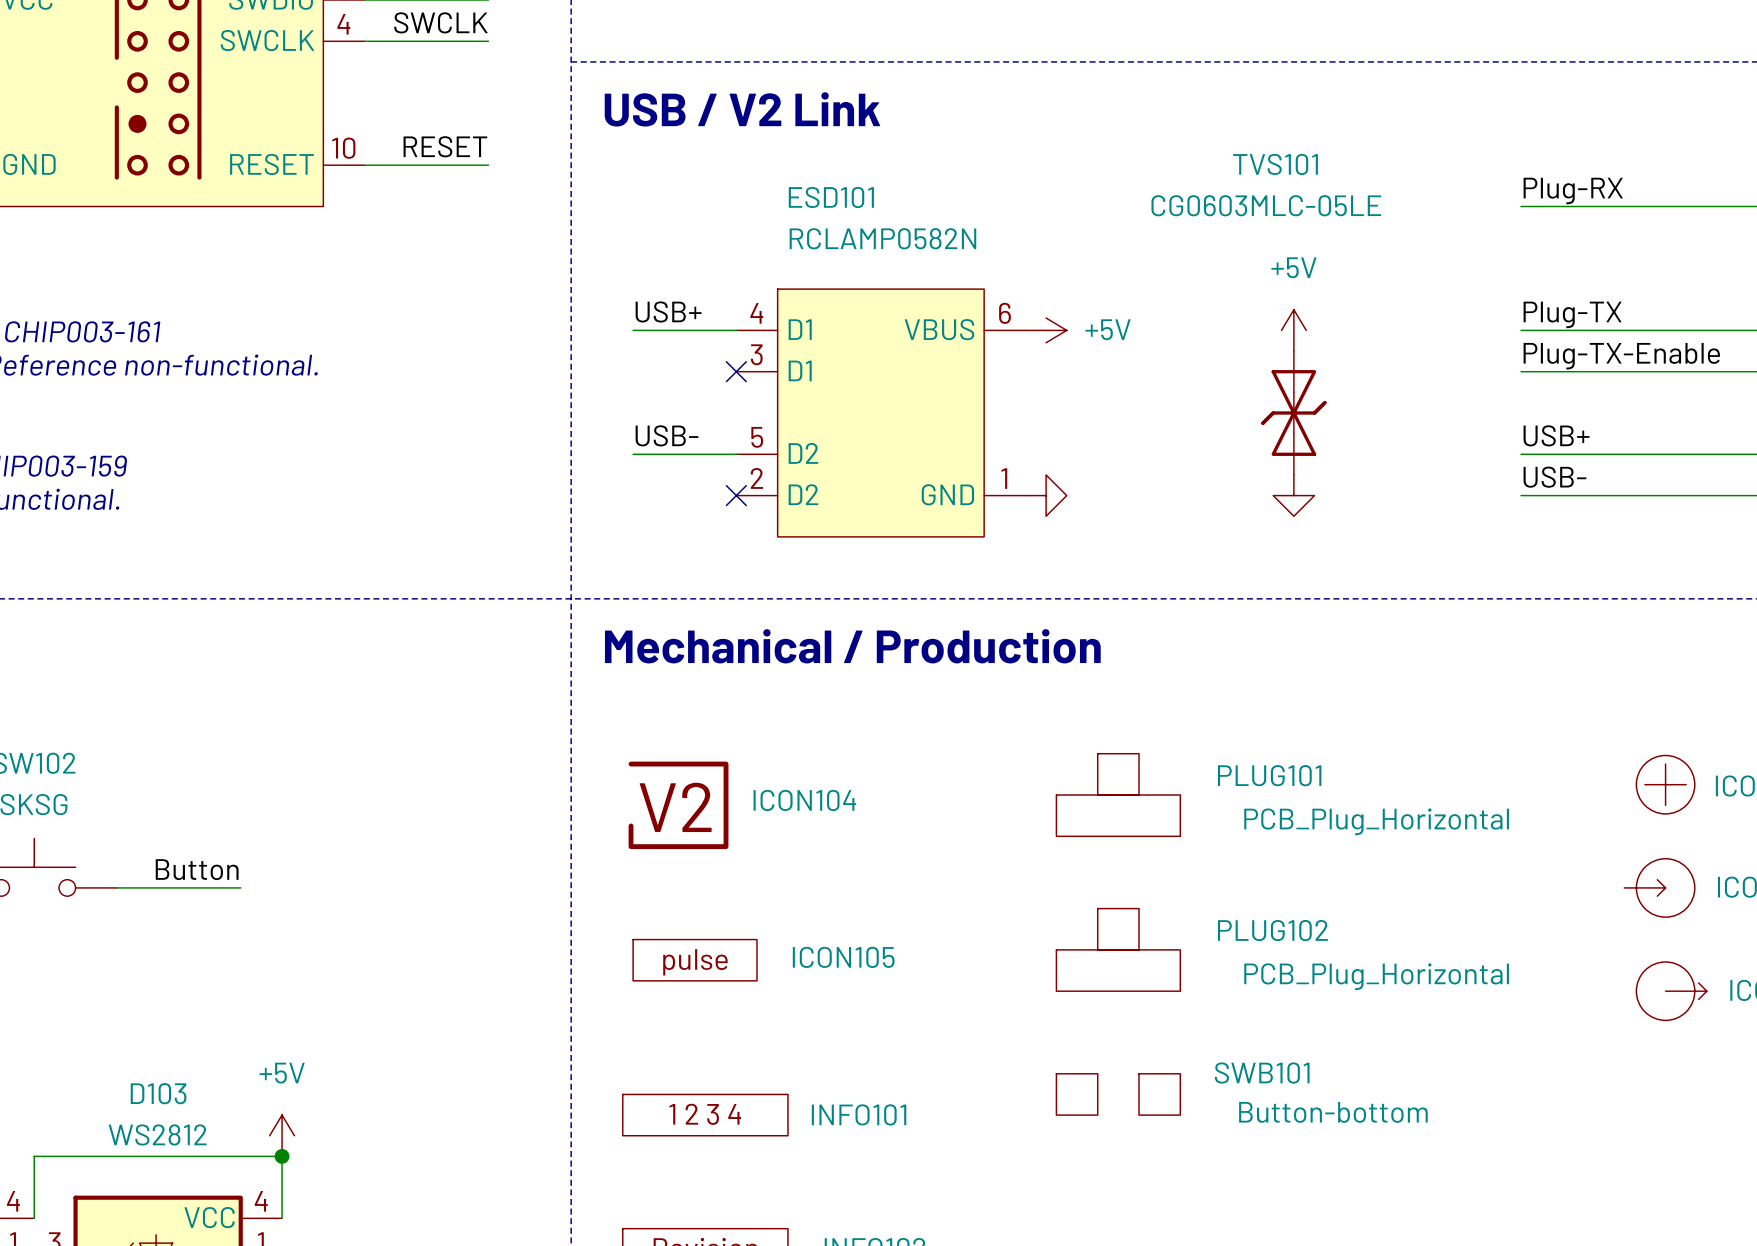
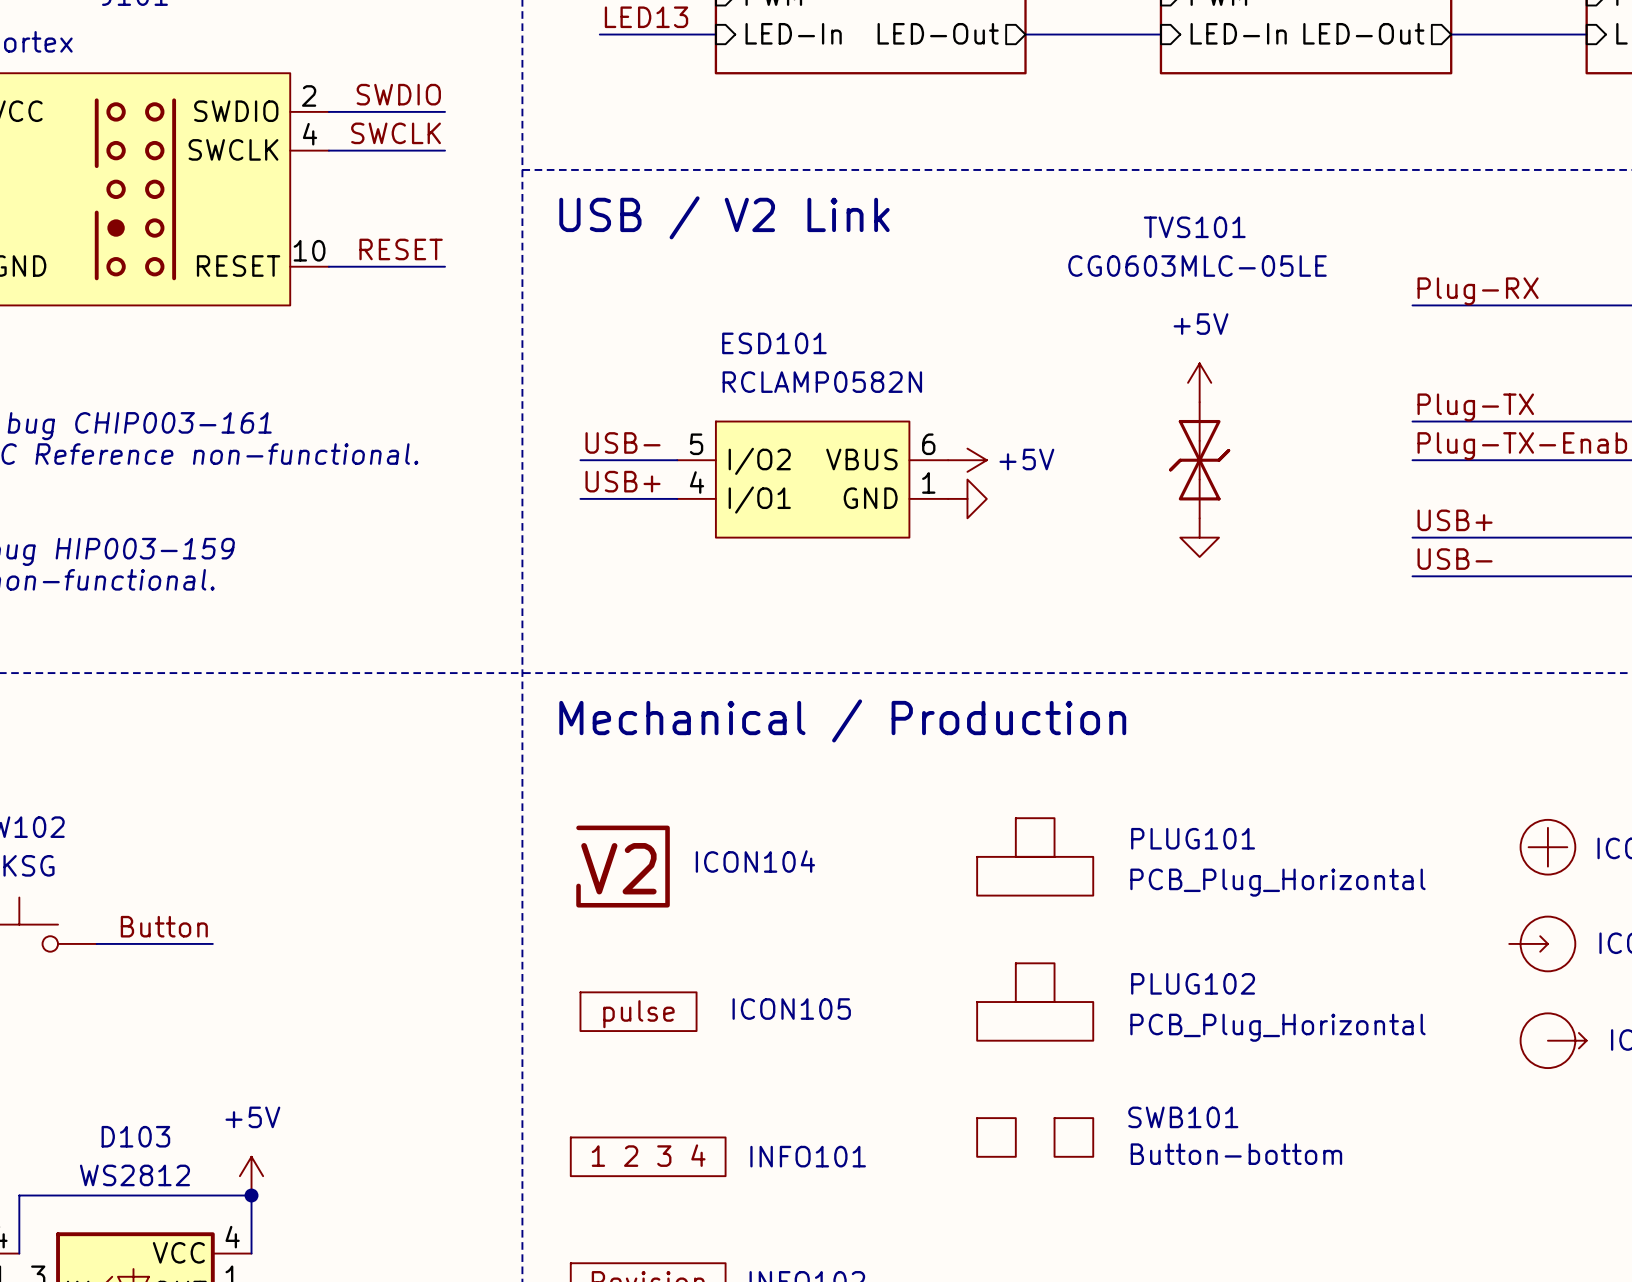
ESD101 name position: ESD101 (831, 197) -> ESD101 (774, 343)
ESD101 value position: RCLAMP0582N (882, 238) -> RCLAMP0582N (822, 382)
ESD101 symbol: [736, 289, 1026, 537] -> [677, 421, 949, 538]
label position: USB+ (668, 311) -> USB+ (622, 481)
wire: (633, 330) (736, 330) -> (580, 460) (677, 460)
power symbol position: +5V (1046, 330) -> +5V (967, 460)
power symbol position: +5V (1293, 330) -> +5V (1199, 382)
no-connect mark: (736, 371) -> none
TVS101 position: (1293, 412) -> (1199, 460)
label position: USB- (667, 435) -> USB- (622, 442)
wire: (633, 454) (736, 454) -> (580, 498) (677, 498)
no-connect mark: (736, 495) -> none
power symbol position: (1046, 495) -> (967, 498)
power symbol position: (1293, 495) -> (1199, 537)

